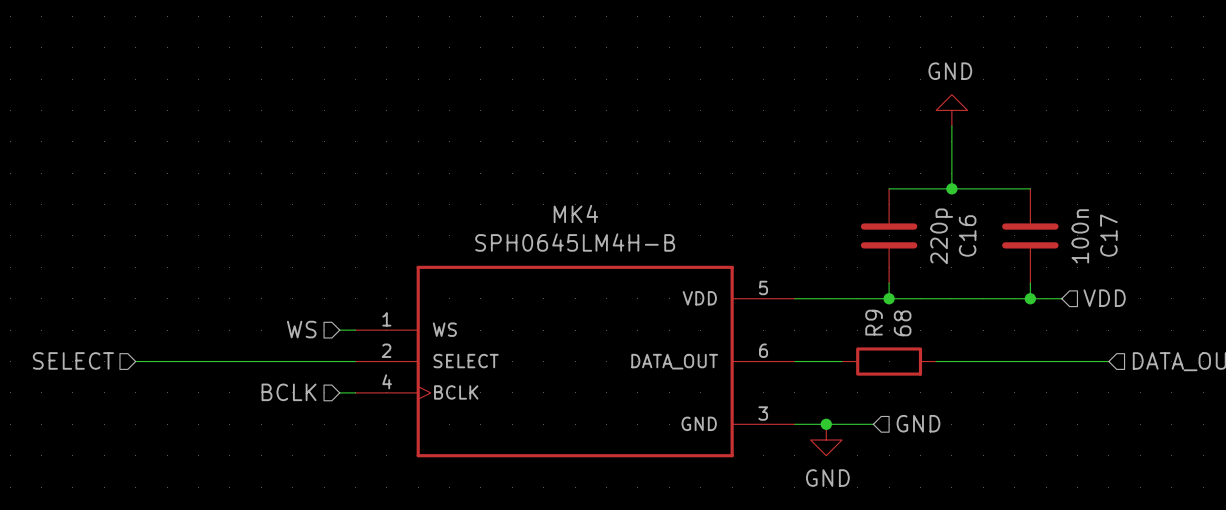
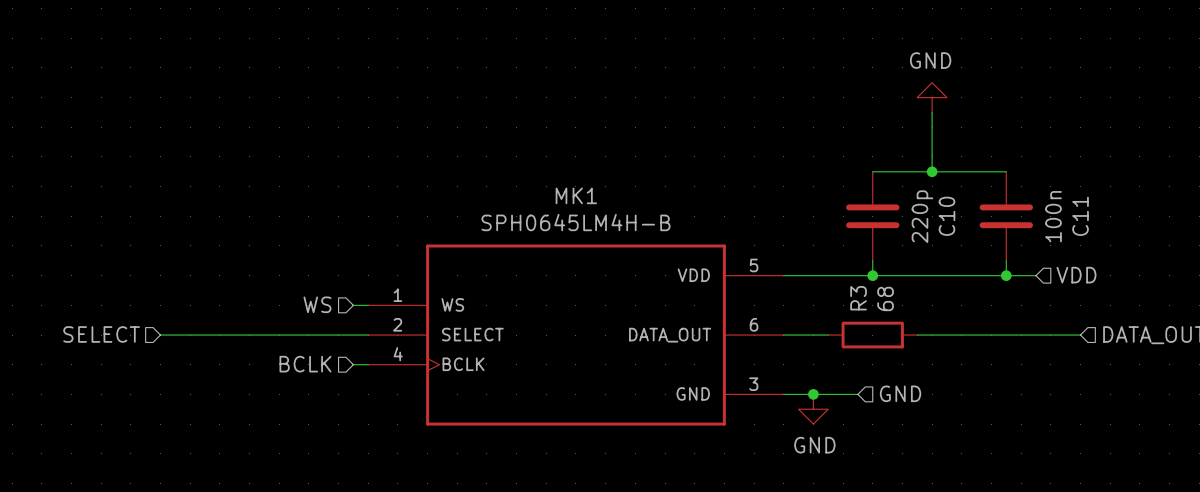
MK4 name: MK4 (575, 213) -> MK1 (576, 195)
C16 name: C16 (967, 235) -> C10 (946, 216)
C17 name: C17 (1108, 235) -> C11 (1080, 216)
R9 name: R9 (874, 322) -> R3 (858, 298)

